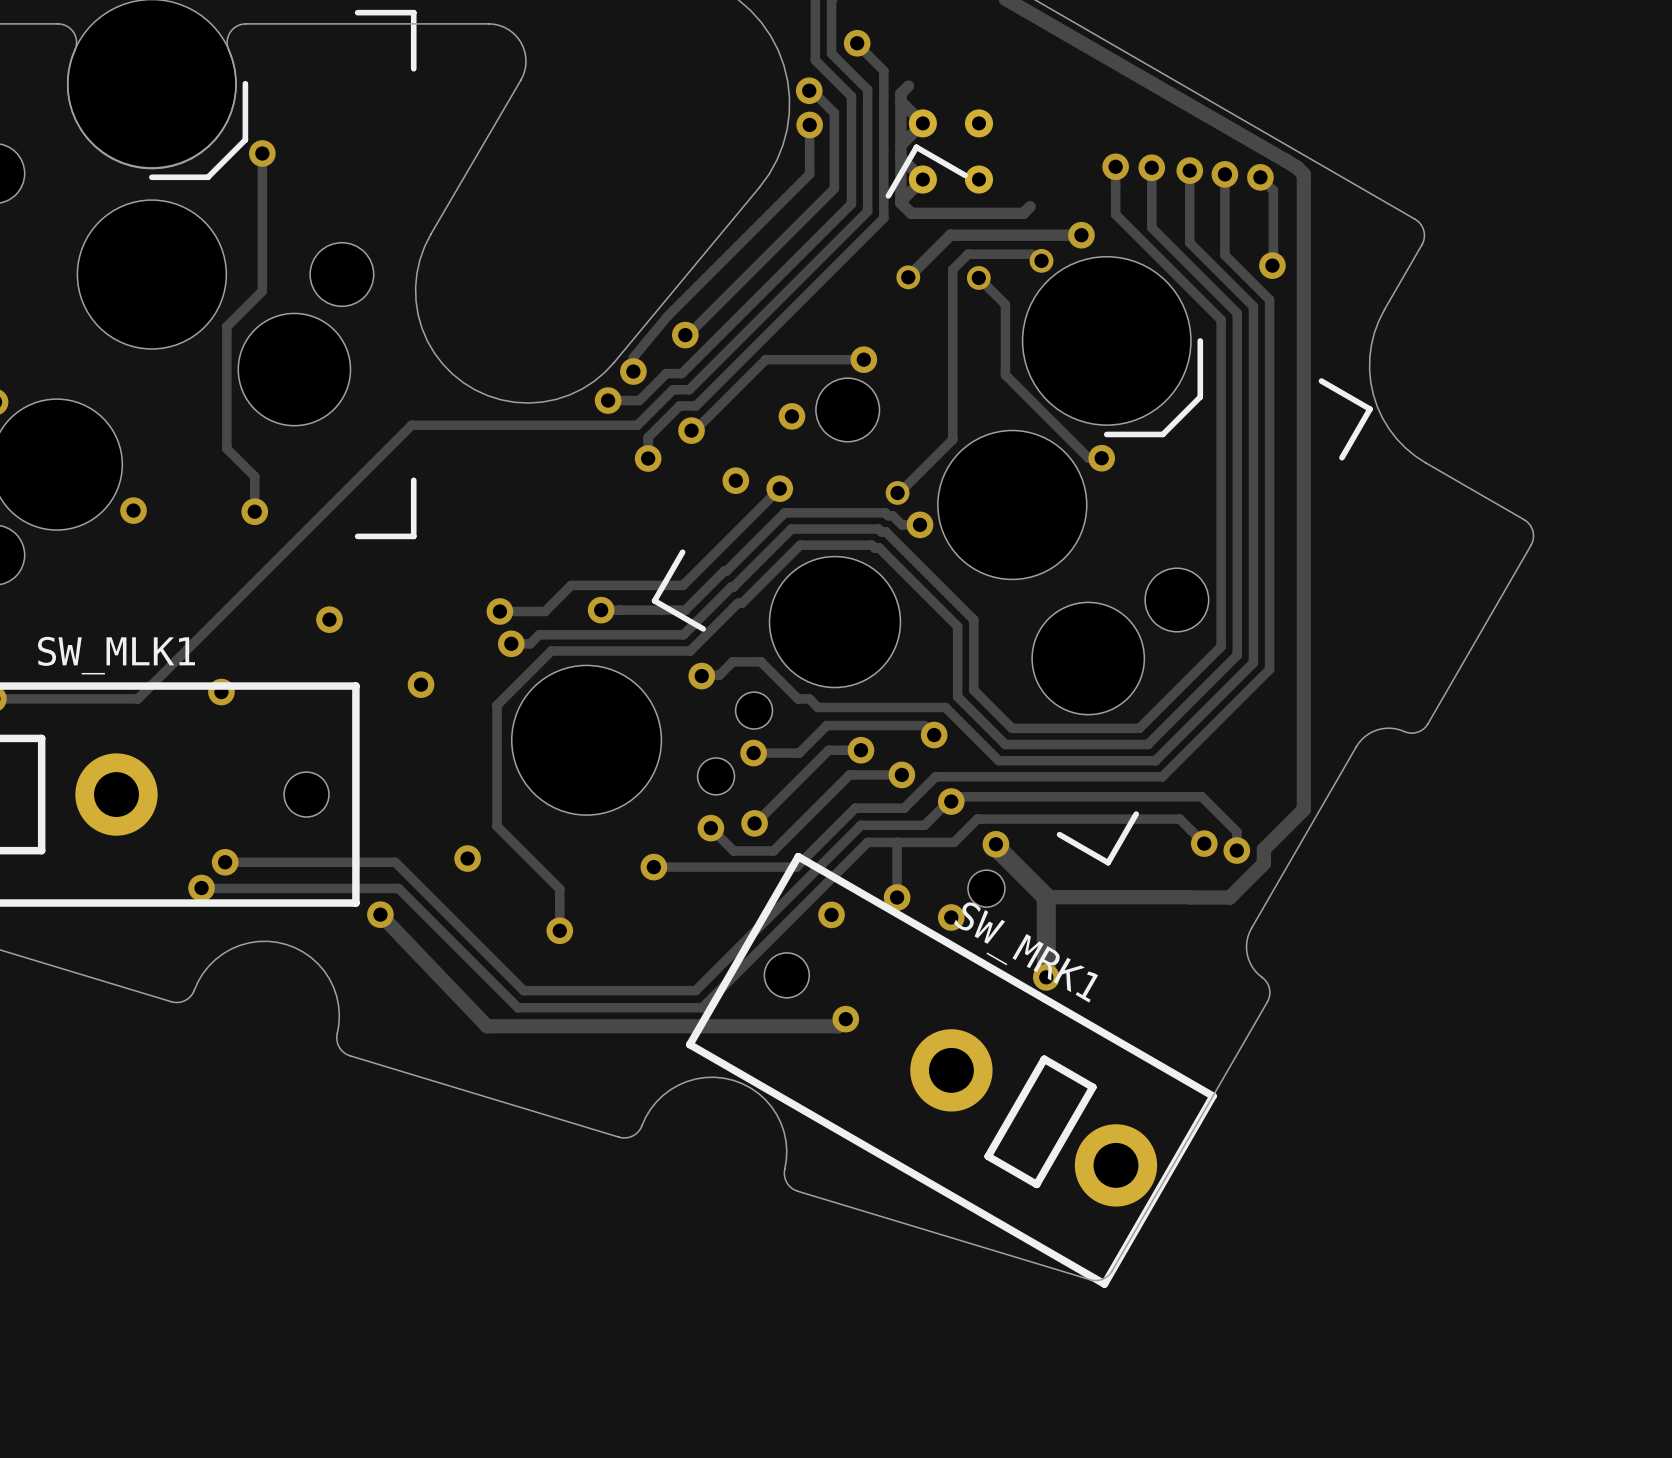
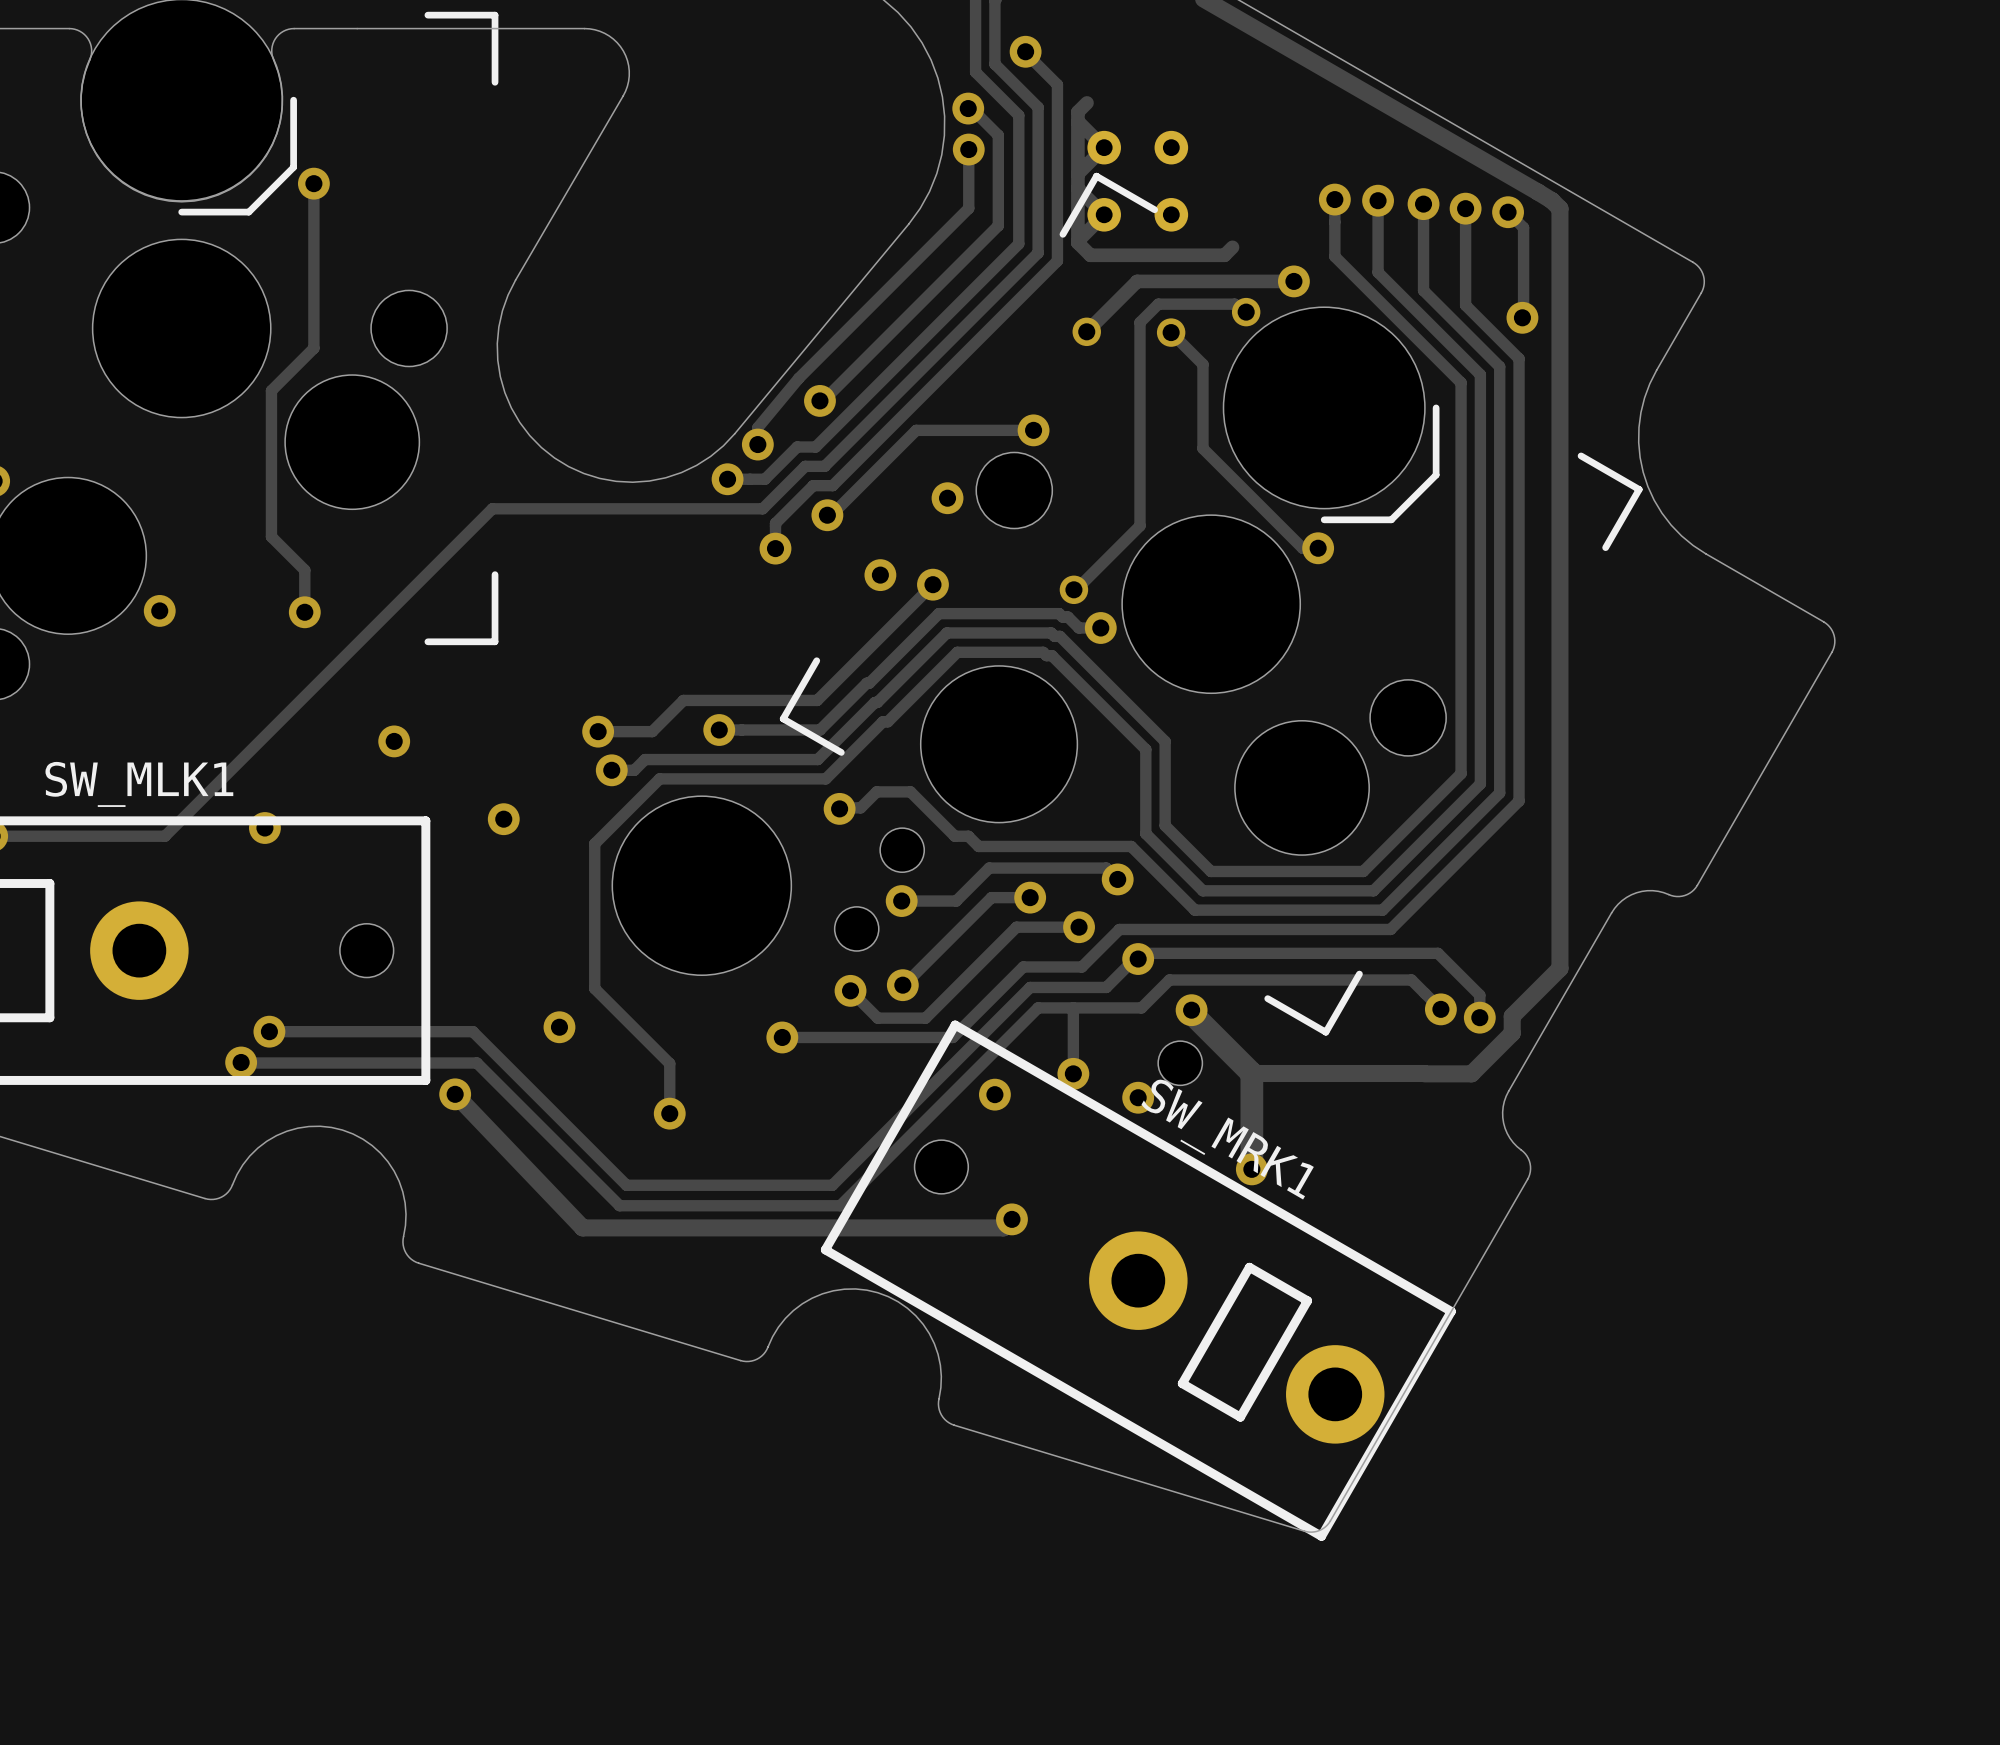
board edge: (1427, 723) (1423, 728) (1415, 732) (1390, 728) (1372, 731) (1358, 743) (1346, 763) -> (1708, 865) (1695, 887) (1687, 894) (1676, 896) (1658, 891) (1641, 891) (1626, 897) (1611, 912)
board edge: (1260, 912) (1249, 932) (1246, 950) (1252, 967) (1268, 986) (1269, 995) (1267, 1001) -> (1508, 1091) (1503, 1106) (1505, 1128) (1513, 1142) (1526, 1155) (1530, 1166) (1528, 1176) (1516, 1198)

